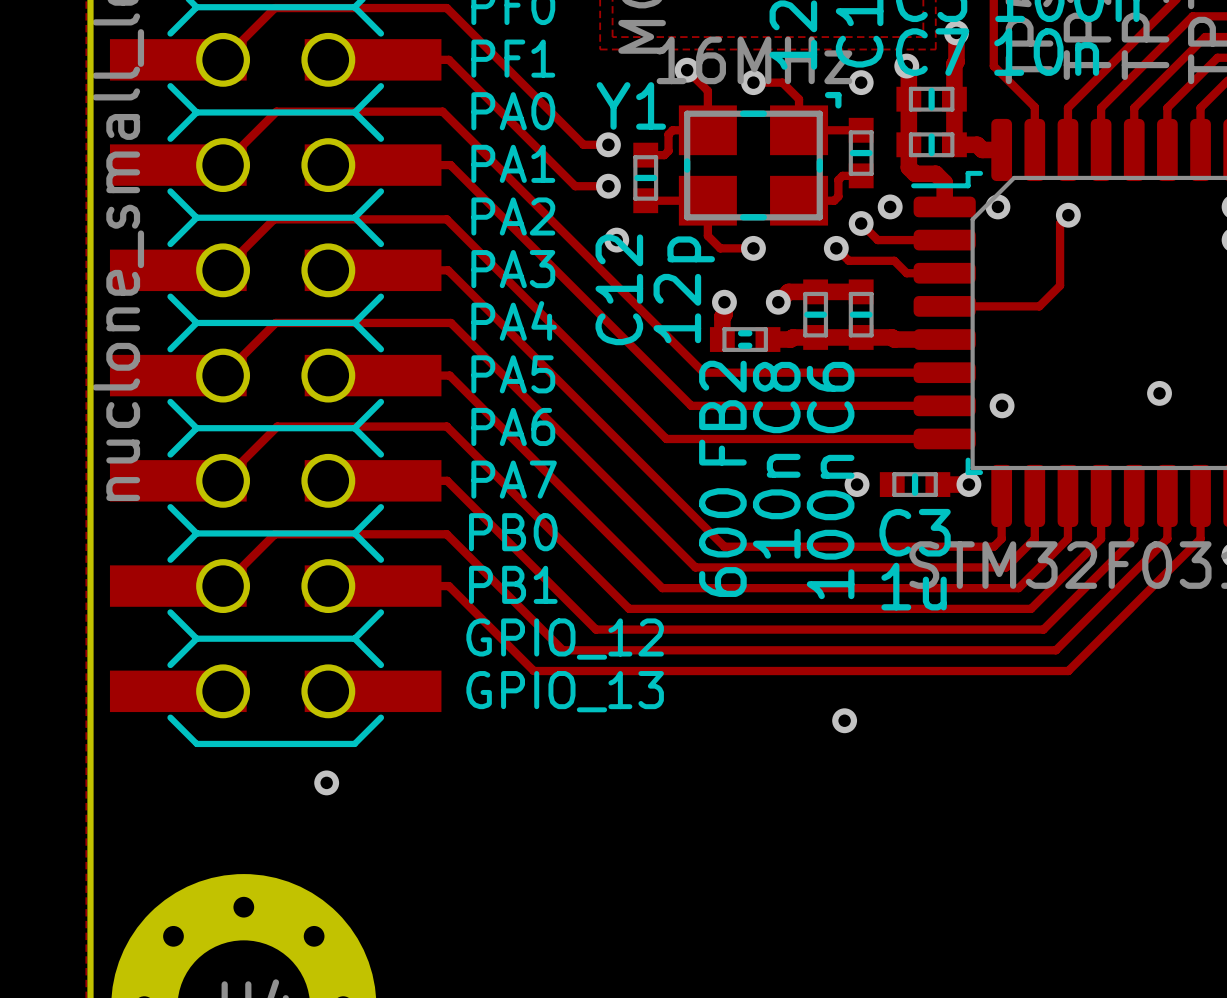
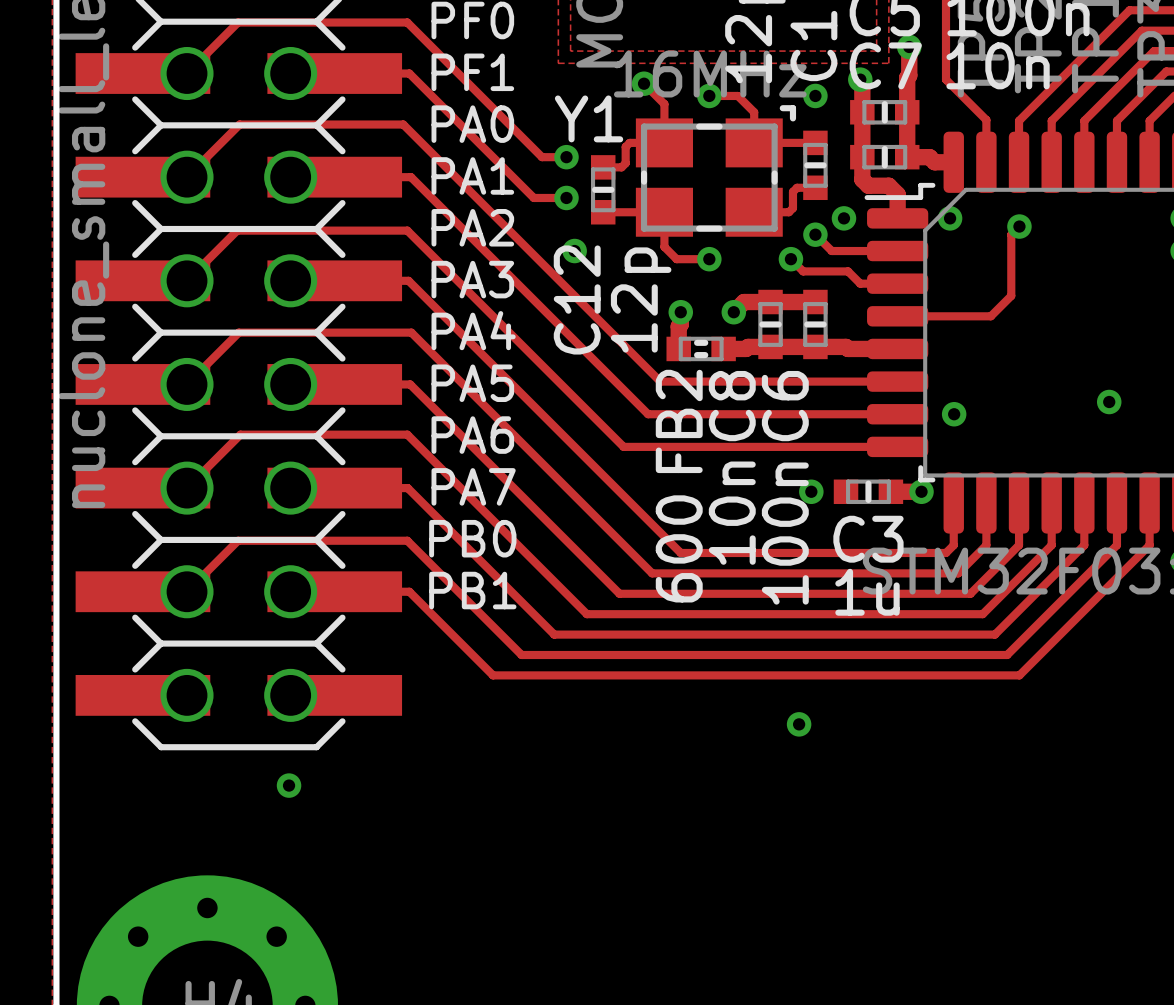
part text: GPIO_12 (565, 639) -> none
part text: GPIO_13 (565, 691) -> none

